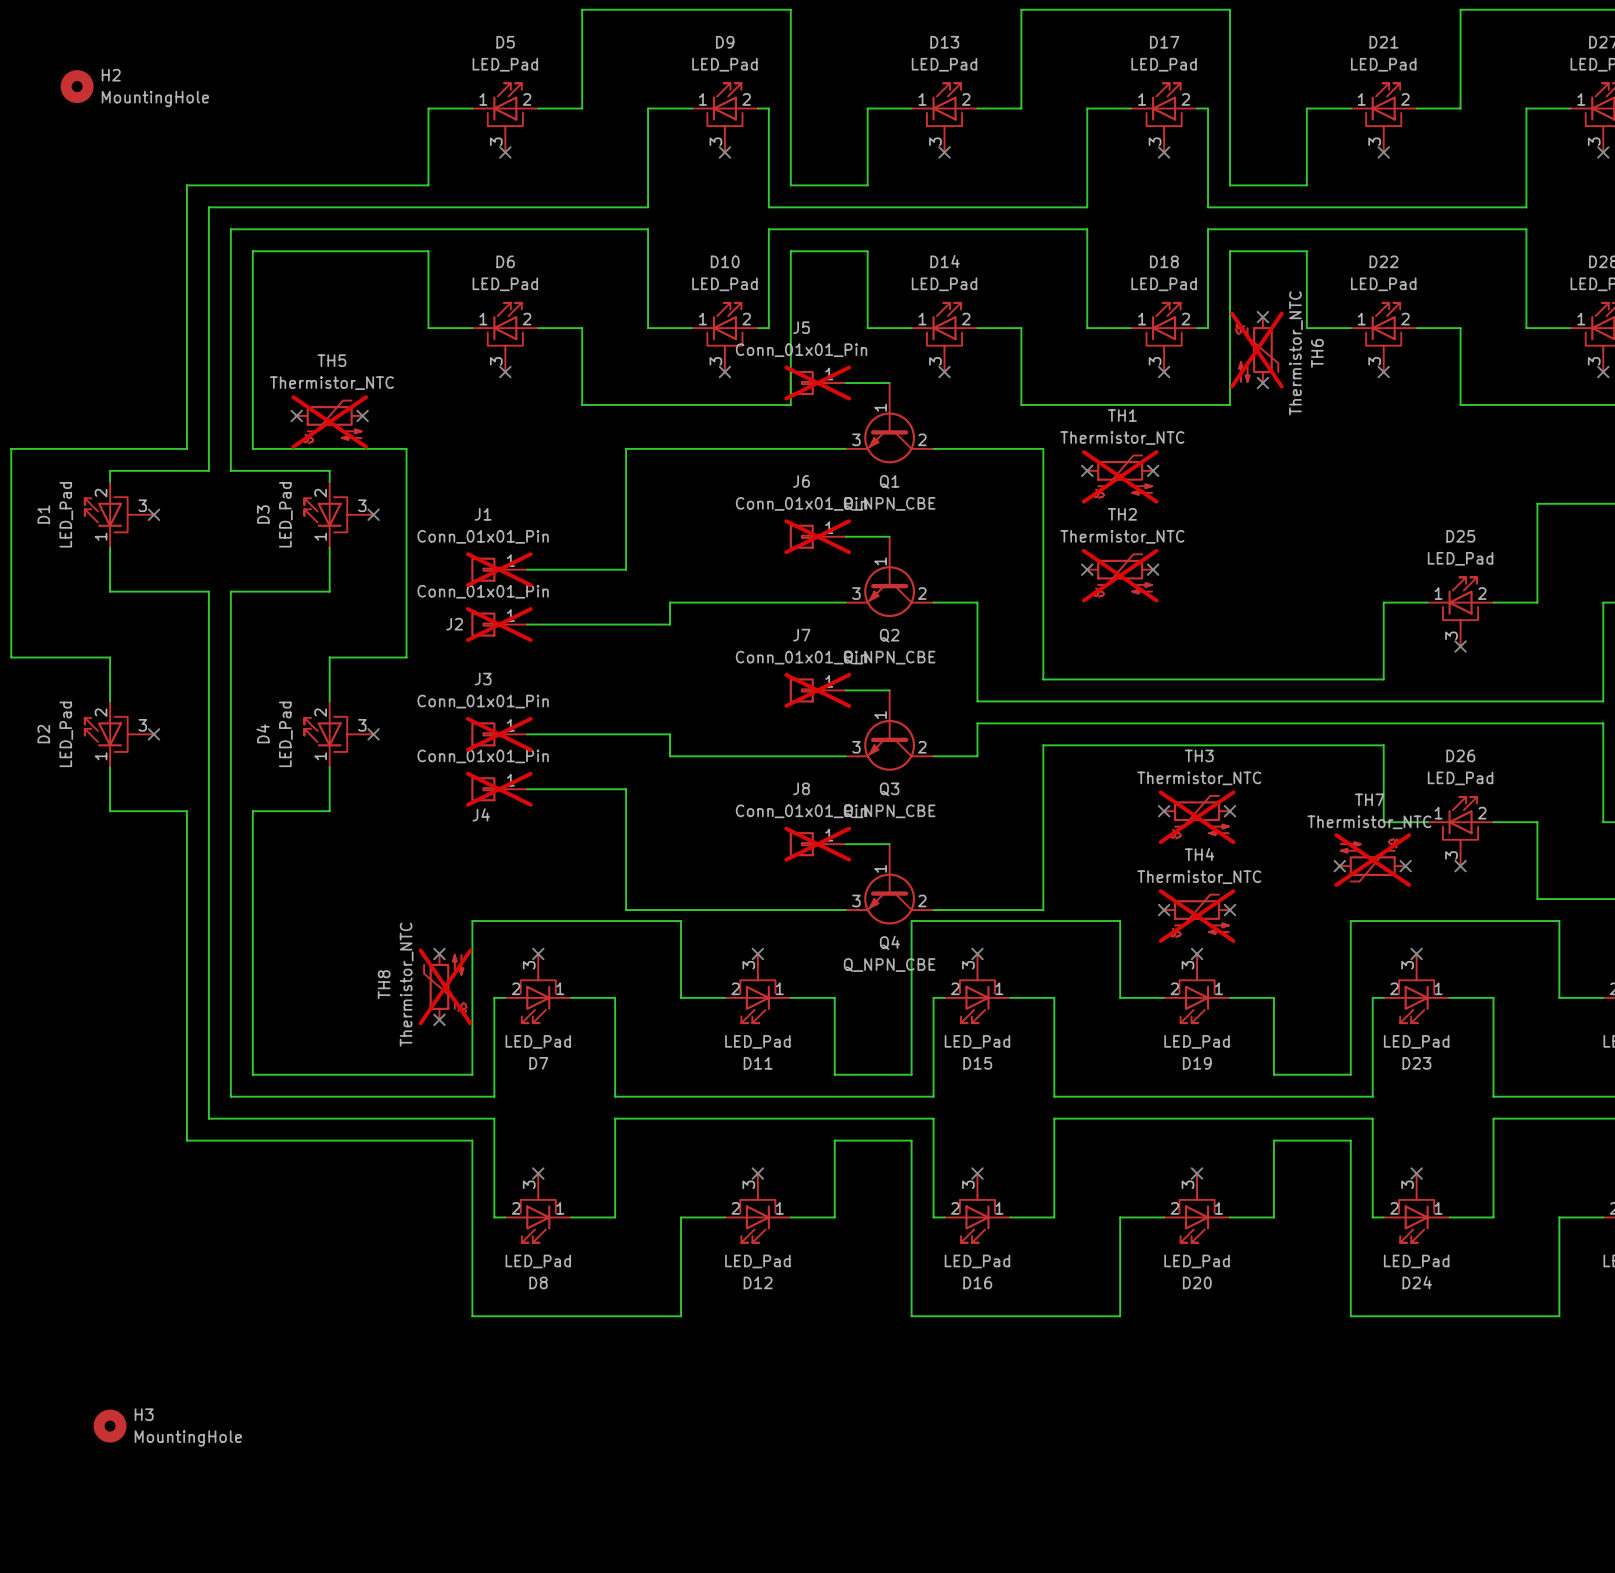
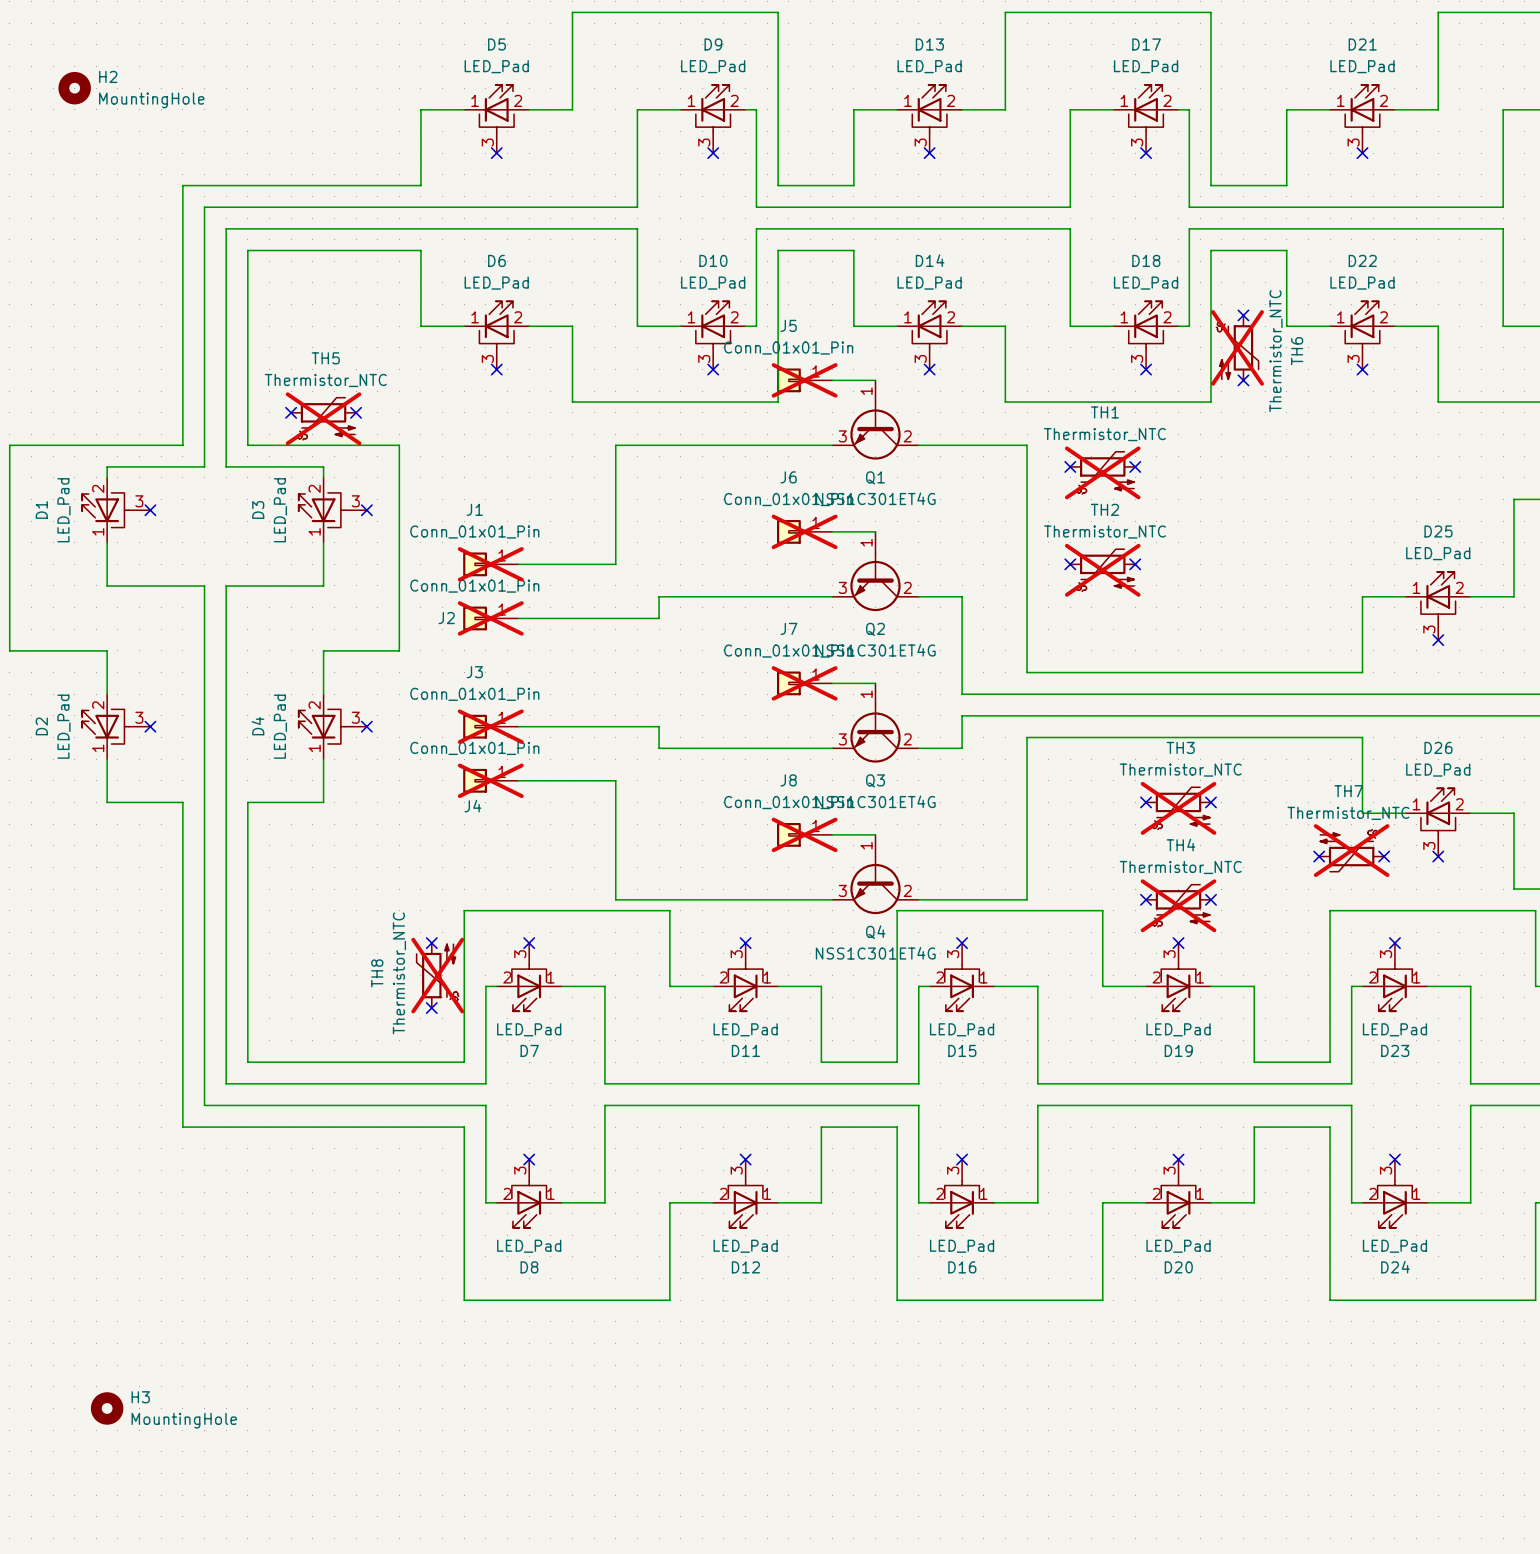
Q1 symbol: [845, 383, 934, 464] -> [832, 380, 919, 460]
Q1 value: Q_NPN_CBE (889, 503) -> NSS1C301ET4G (875, 498)
Q2 symbol: [845, 536, 934, 618] -> [832, 531, 919, 612]
Q2 value: Q_NPN_CBE (889, 657) -> NSS1C301ET4G (875, 650)
Q3 symbol: [845, 690, 934, 771] -> [832, 683, 919, 763]
Q3 value: Q_NPN_CBE (889, 811) -> NSS1C301ET4G (875, 801)
Q4 symbol: [845, 844, 934, 925] -> [832, 834, 919, 915]
Q4 value: Q_NPN_CBE (889, 965) -> NSS1C301ET4G (875, 953)

